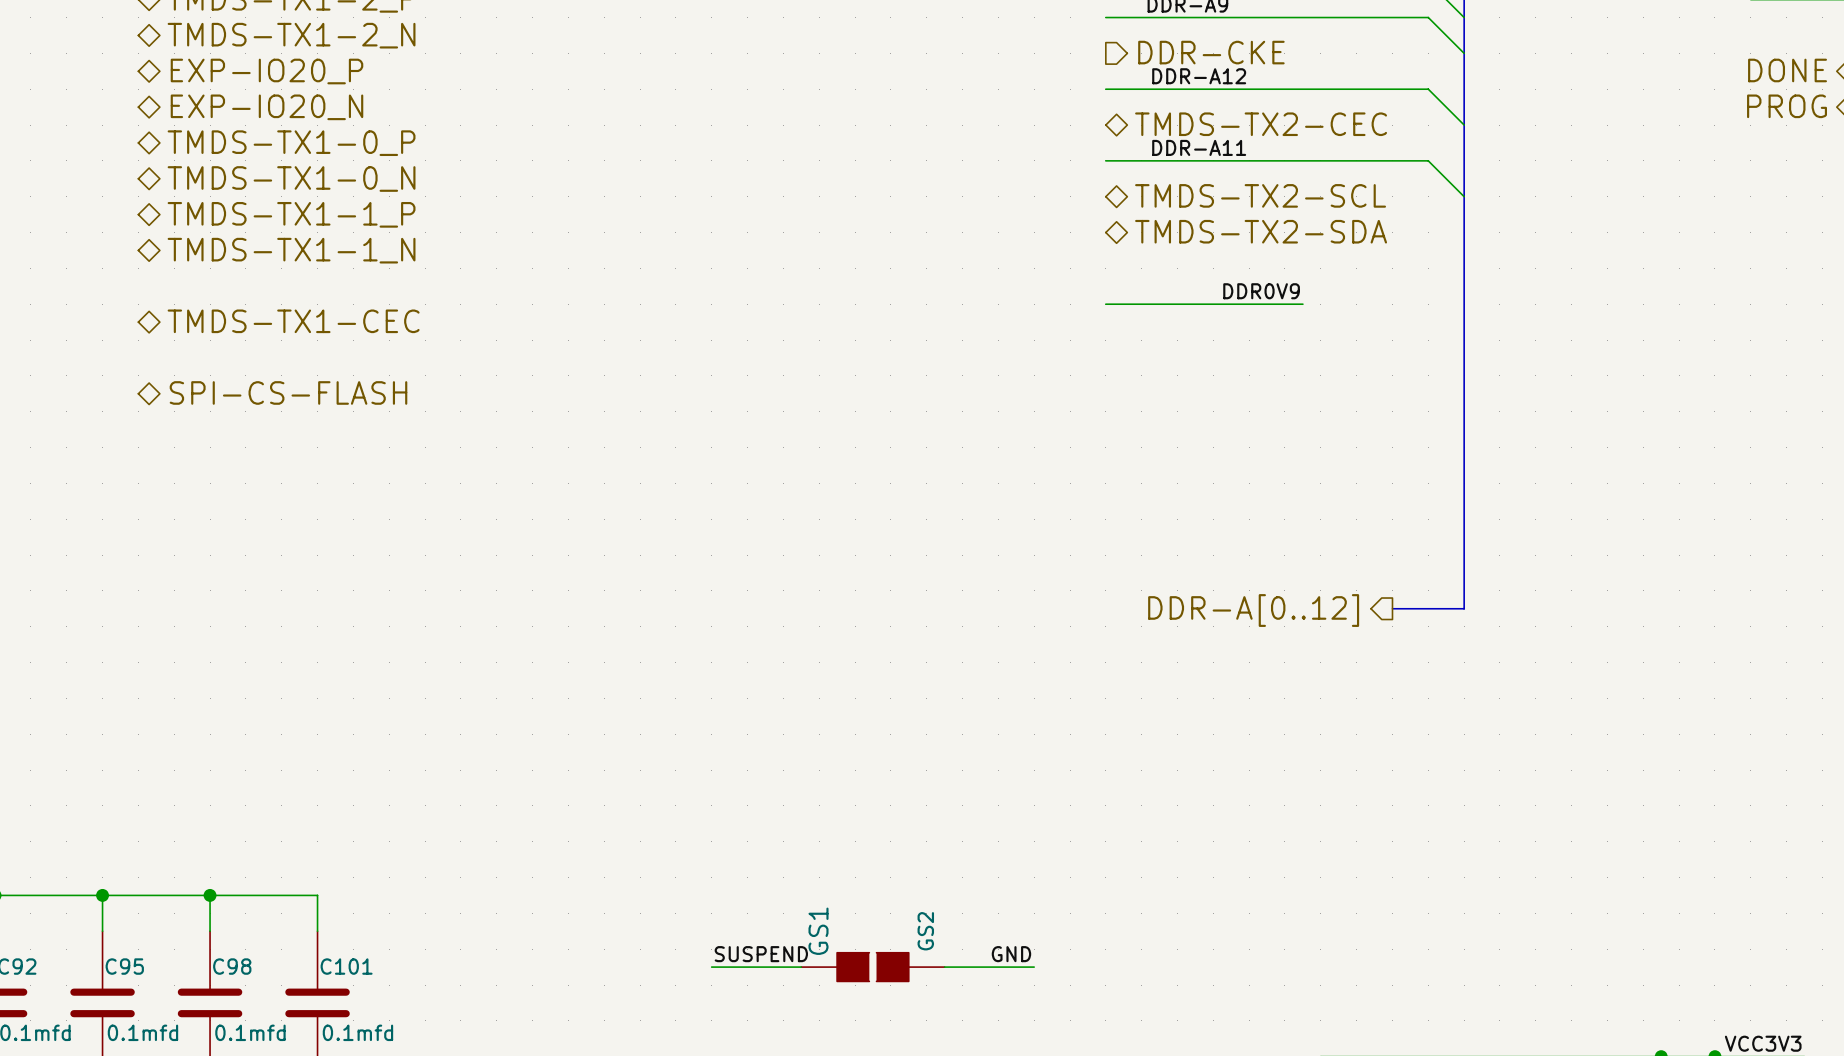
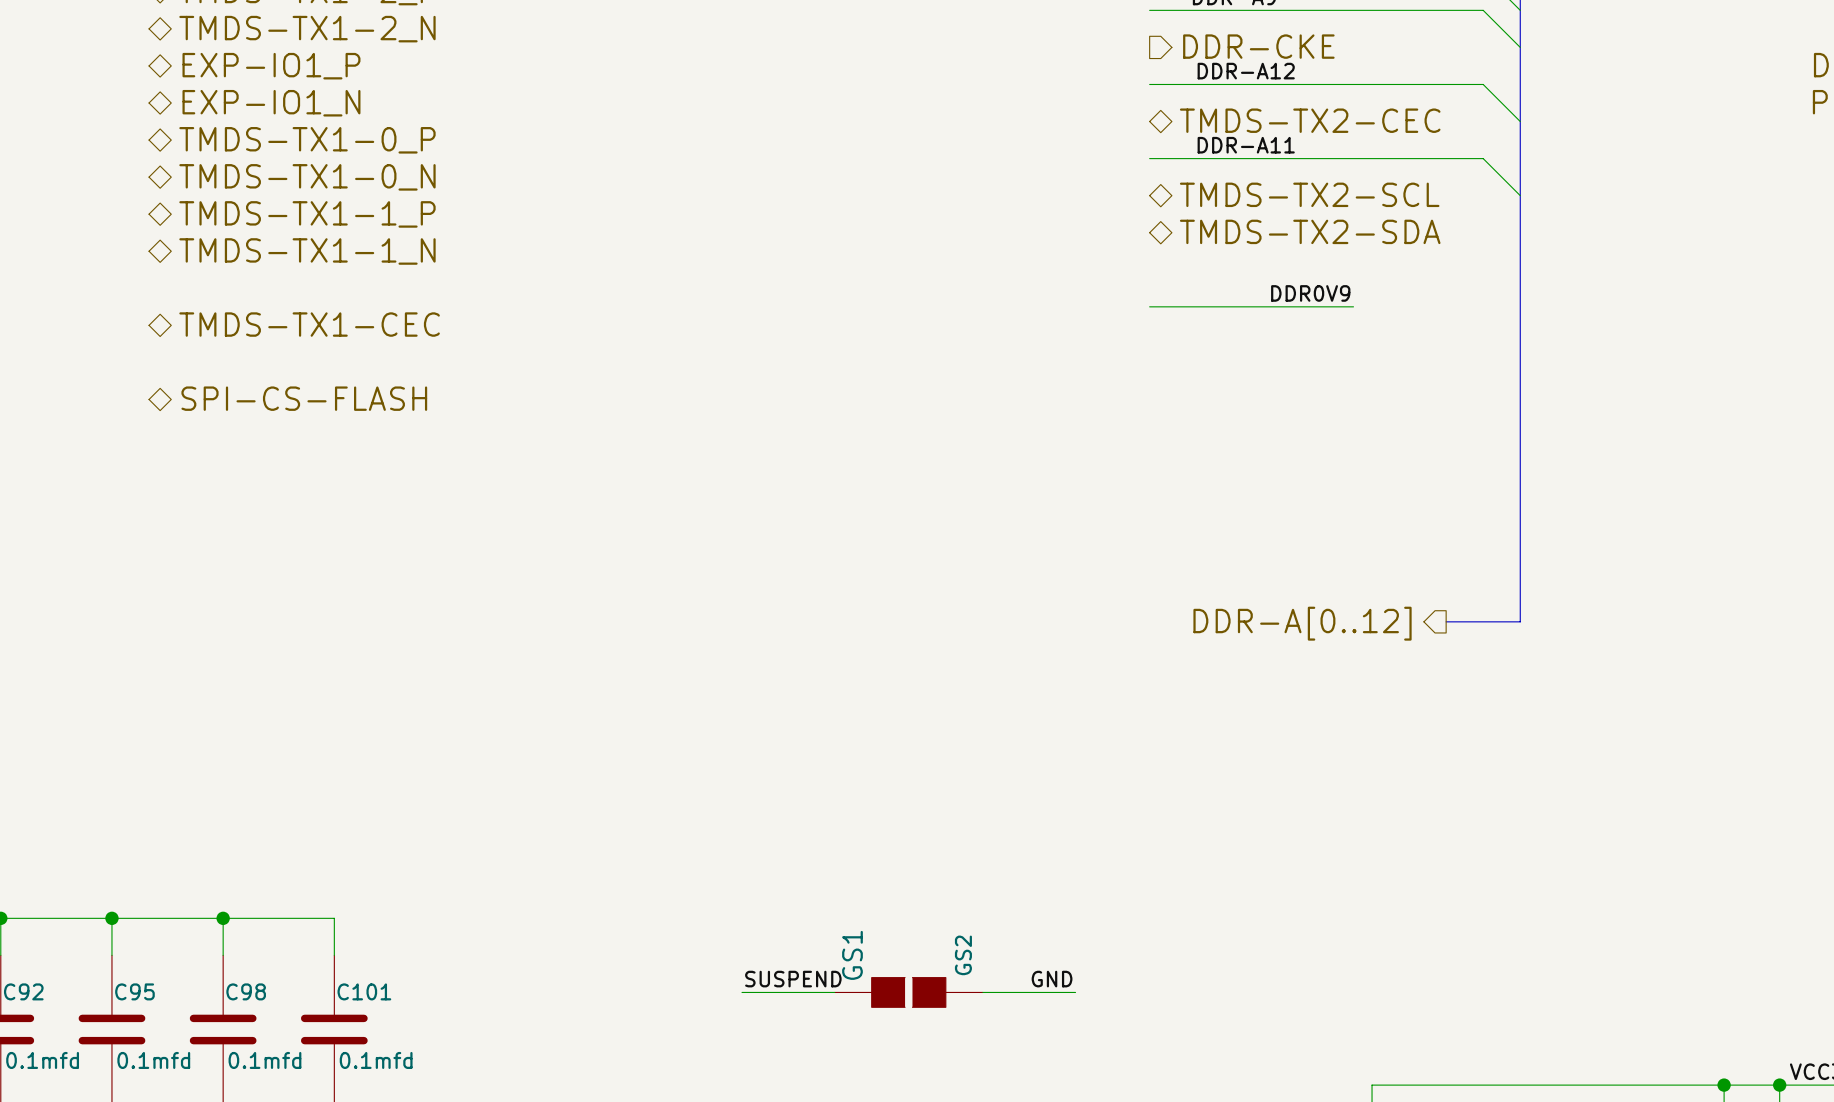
hierarchical label: EXP-IO20_P (266, 71) -> EXP-IO1_P (271, 66)
hierarchical label: EXP-IO20_N (266, 107) -> EXP-IO1_N (271, 103)

